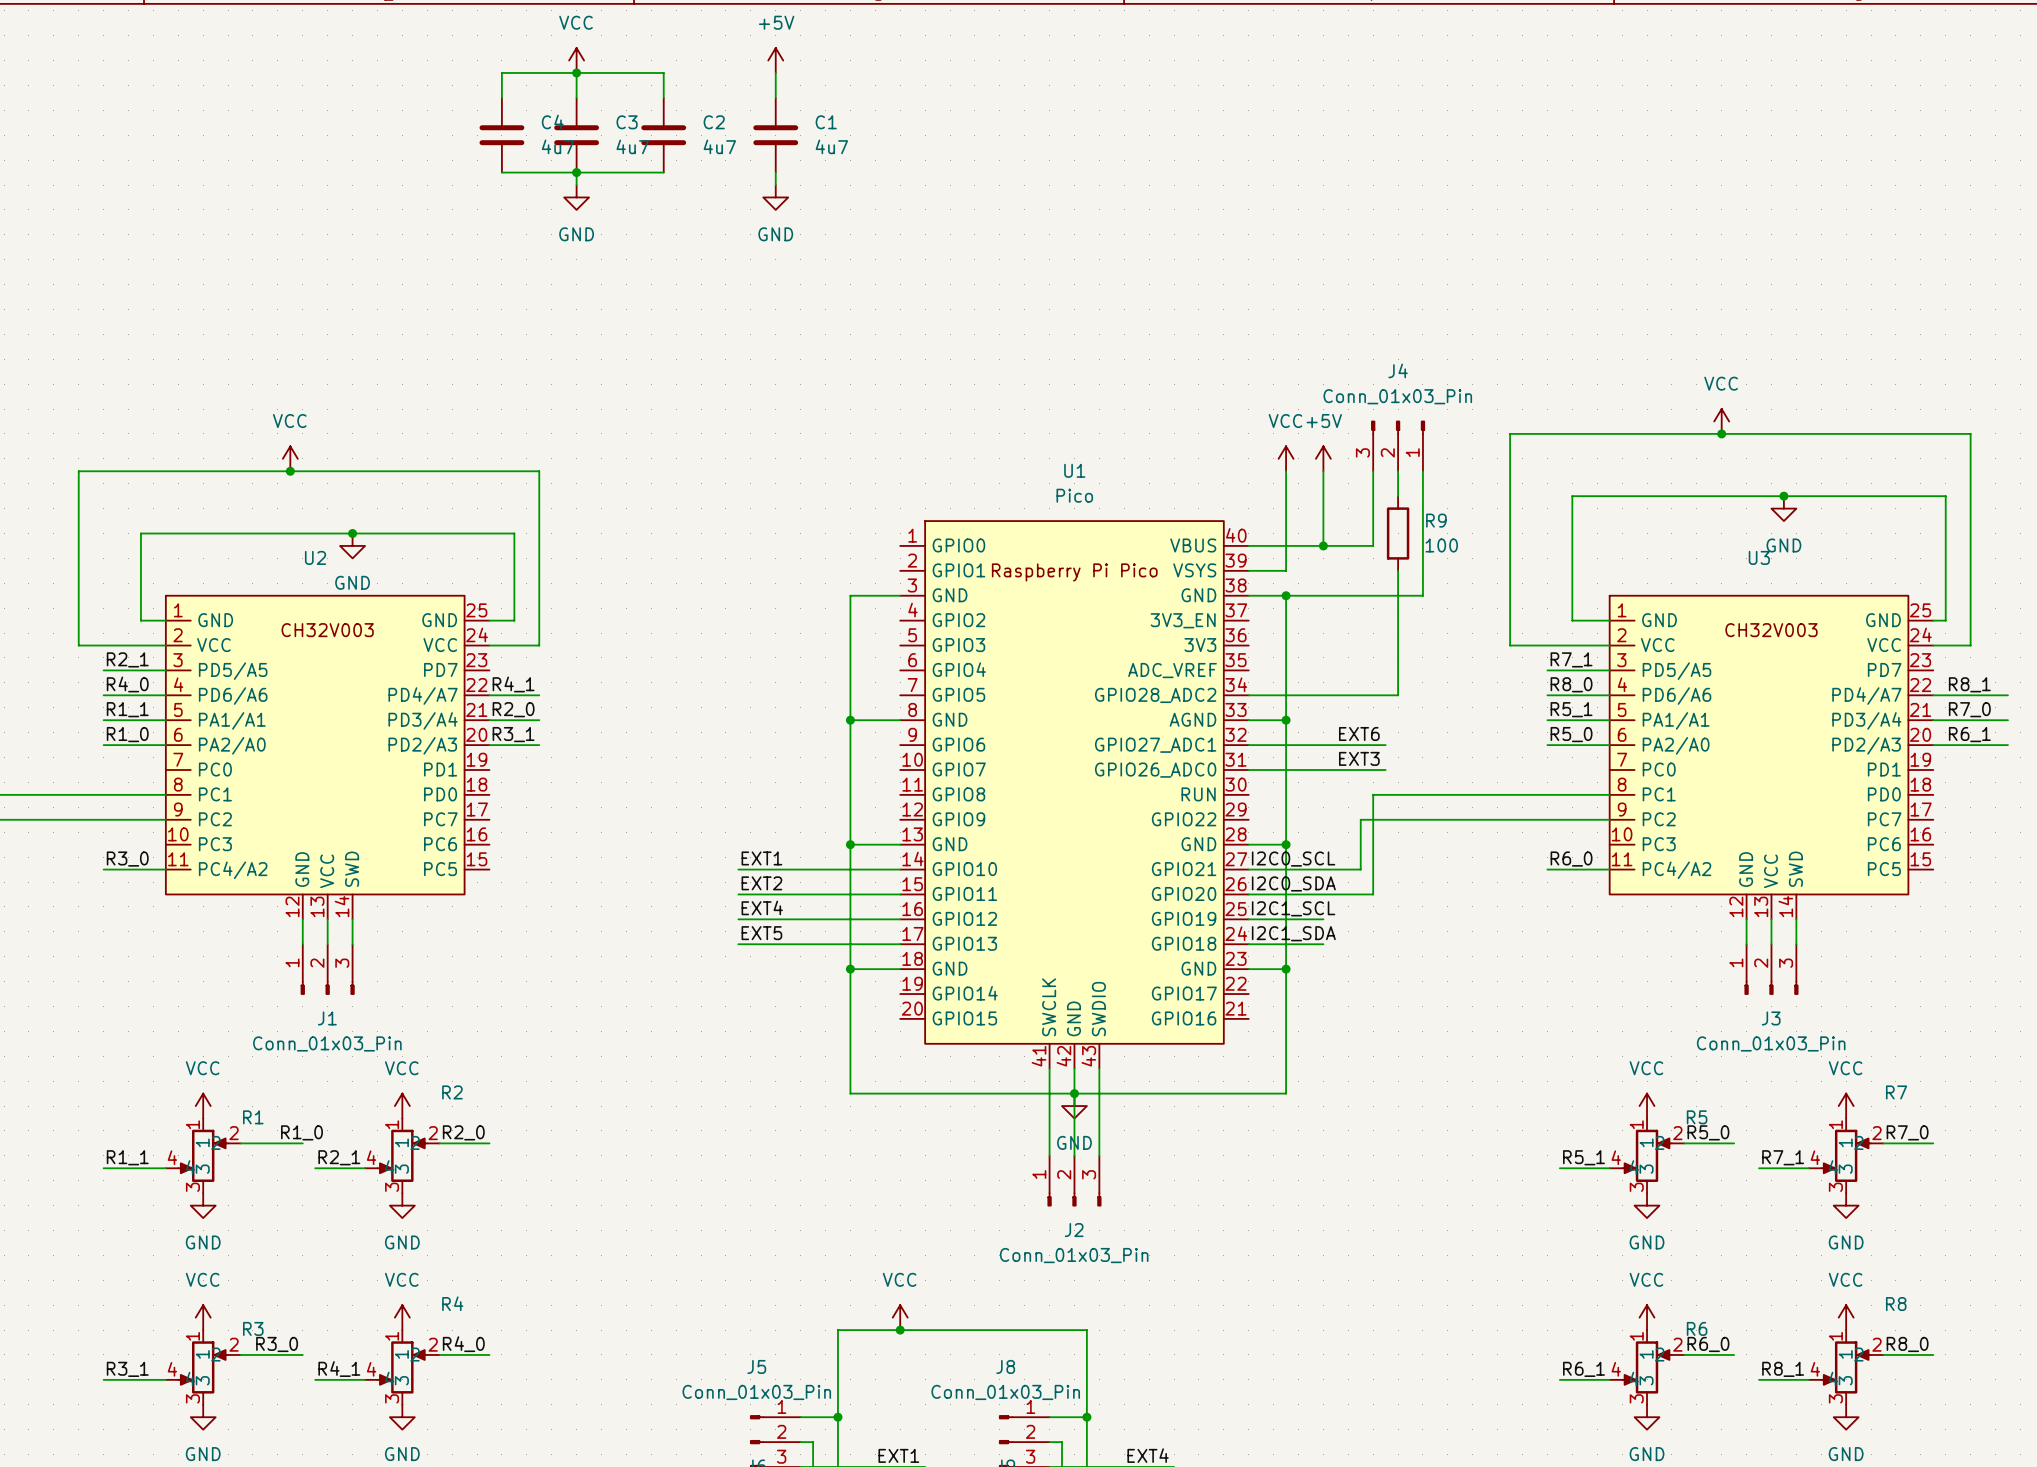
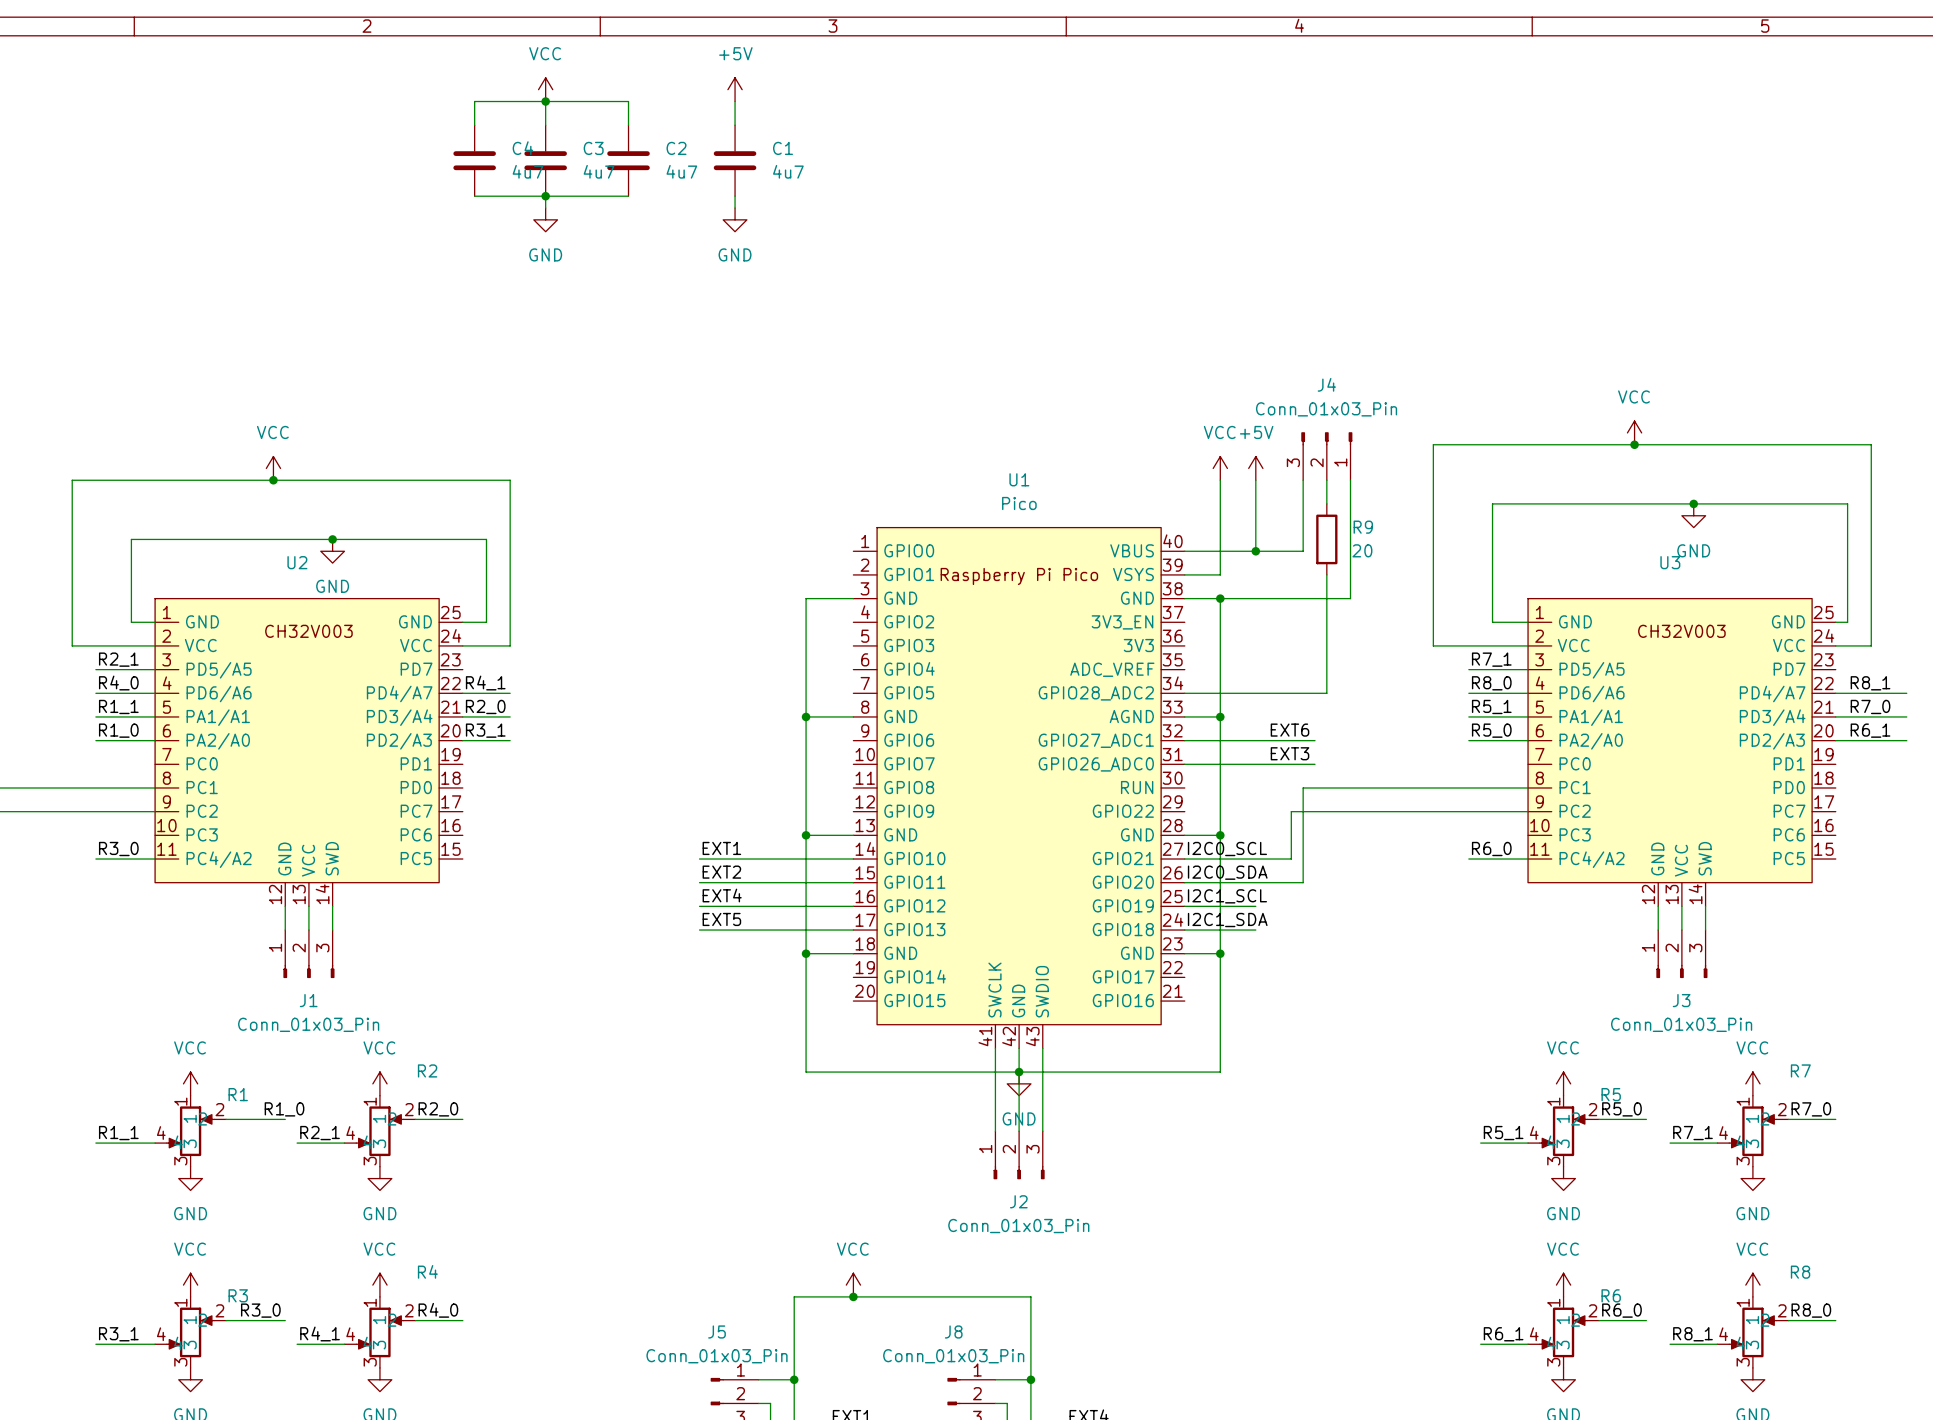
R9 value: 100 (1441, 545) -> 20 (1362, 550)

